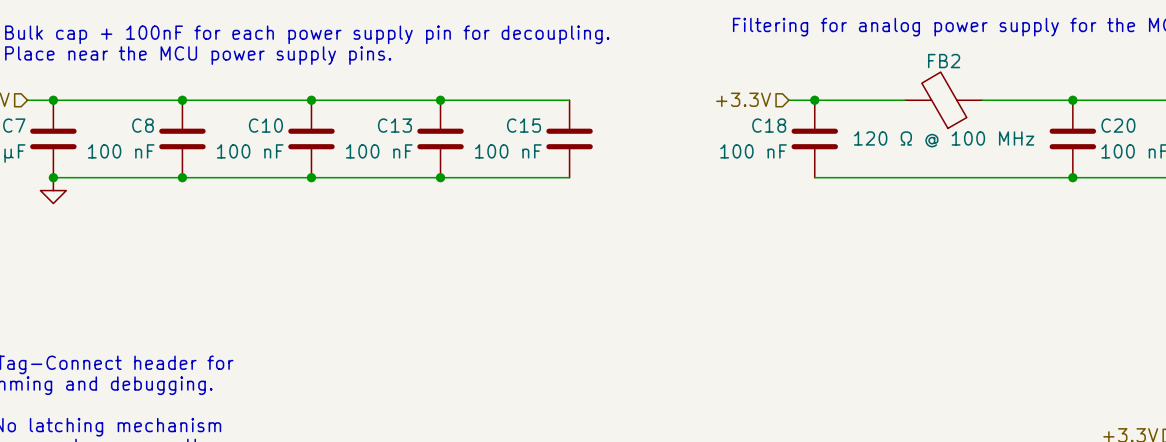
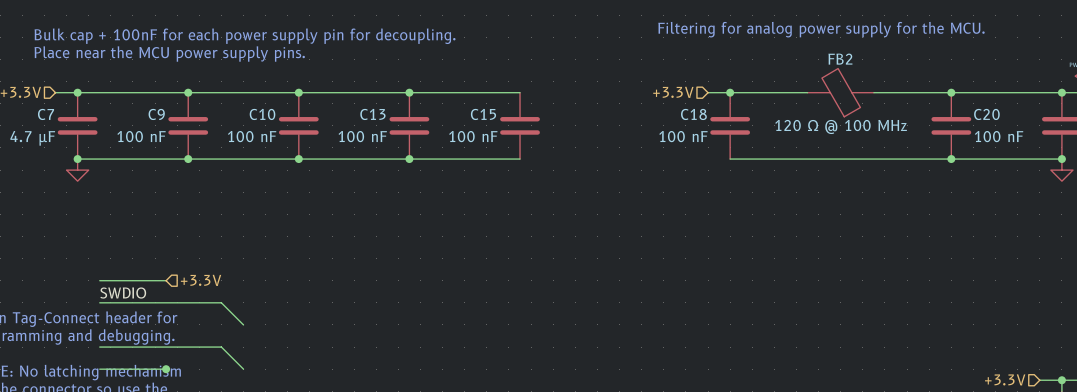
C8 name: C8 (143, 125) -> C9 (156, 114)
wire: none -> (99, 280) (166, 280)
hierarchical label: none -> +3.3V (201, 280)
label: none -> SWDIO (123, 293)
wire: none -> (99, 302) (221, 302) (243, 324)
wire: none -> (99, 347) (221, 347) (243, 369)
wire: none -> (99, 369) (166, 369)
junction: none -> (166, 369)

